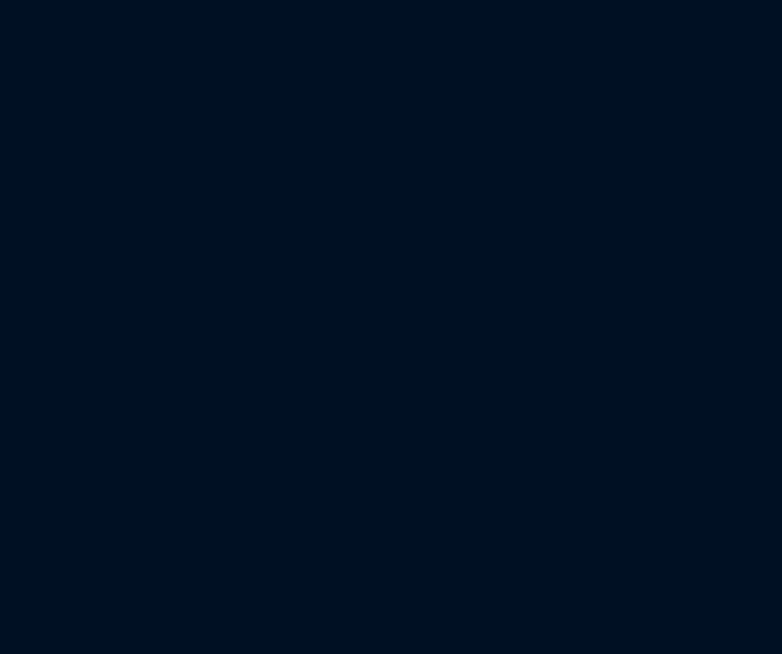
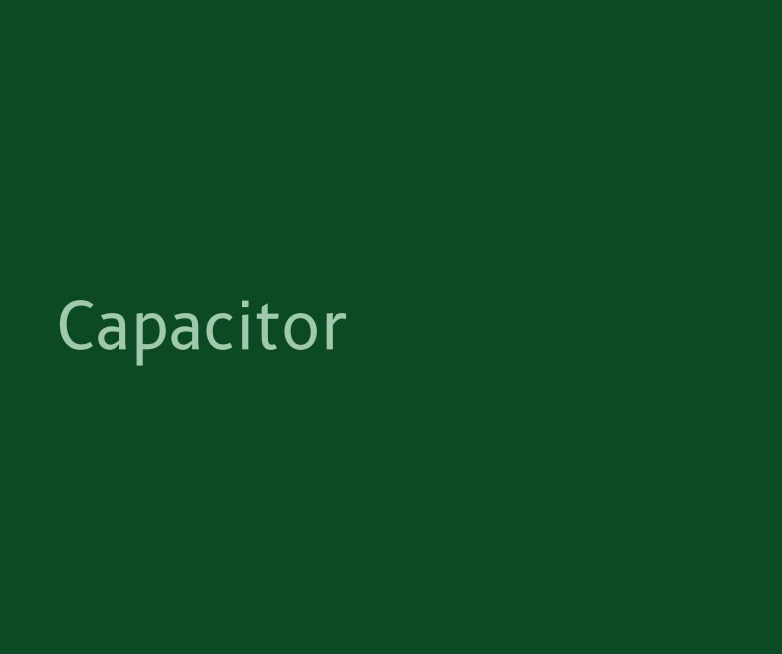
text: none -> Capacitor (202, 332)

